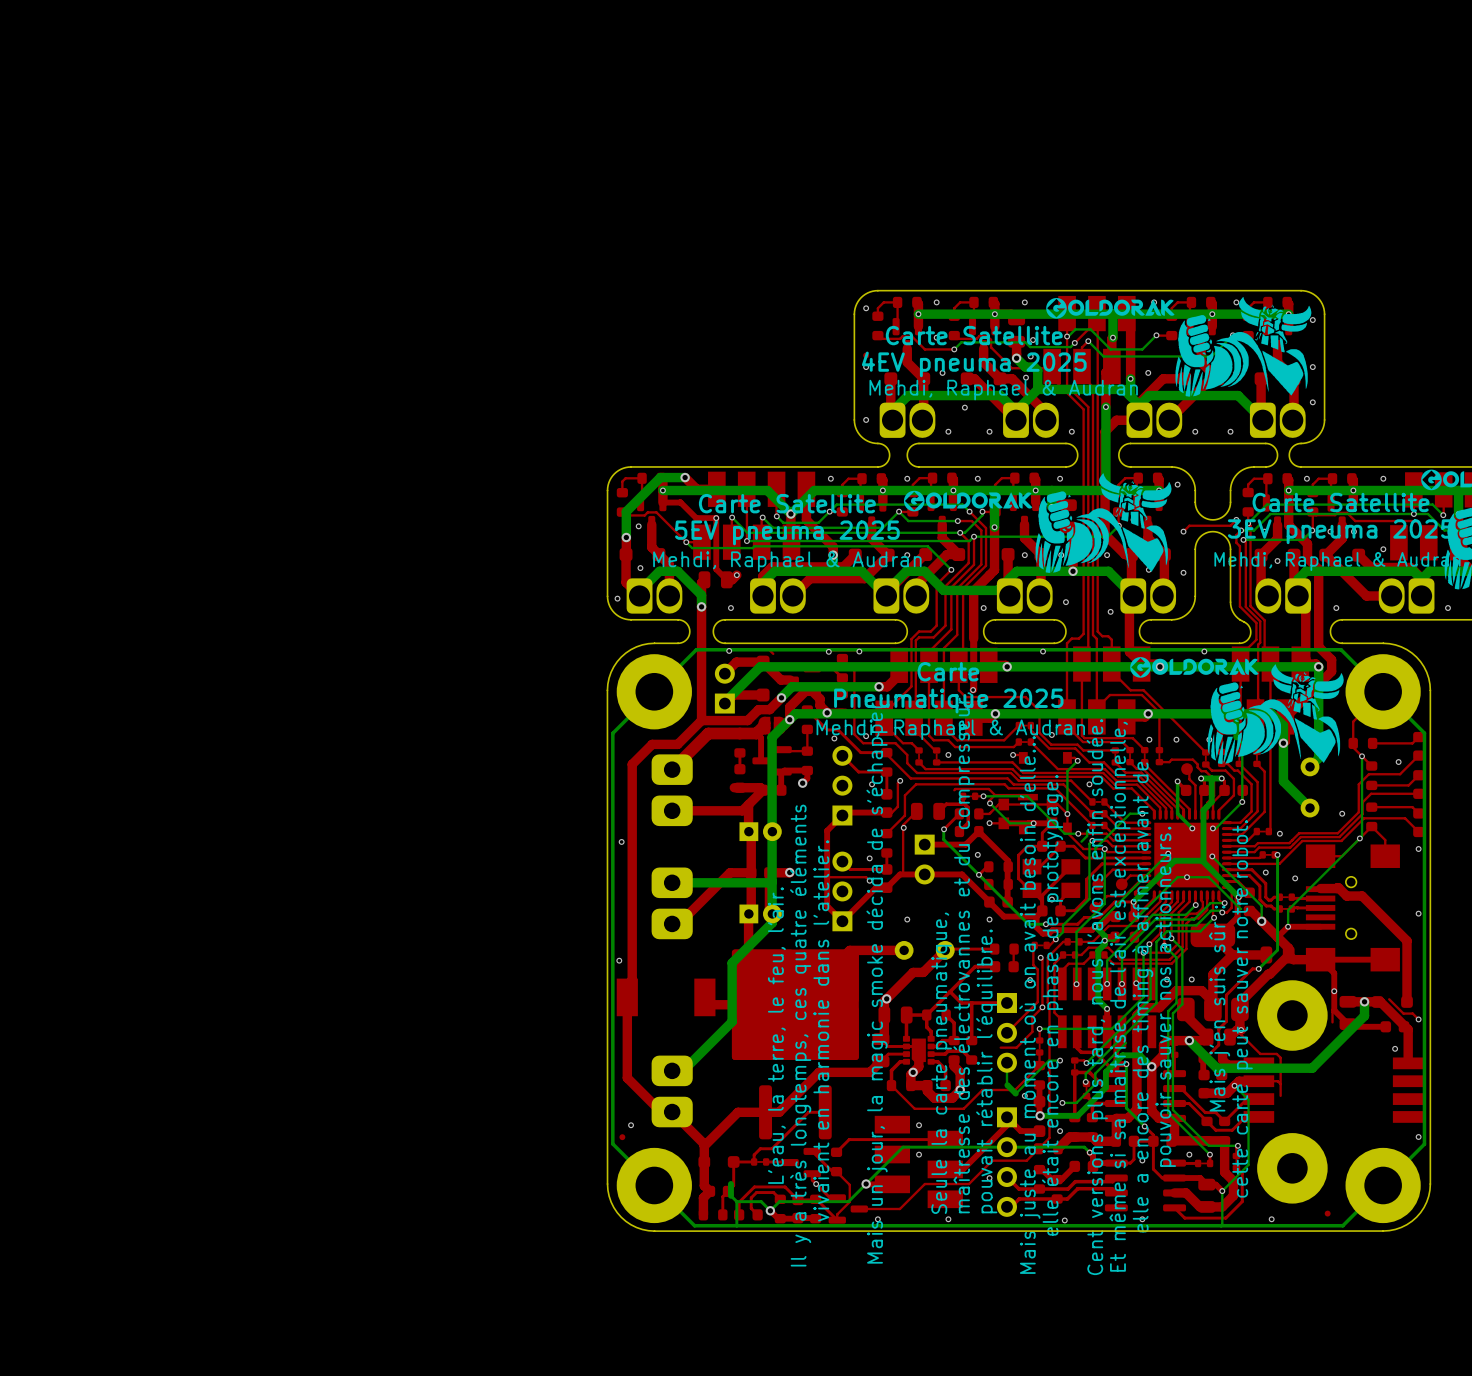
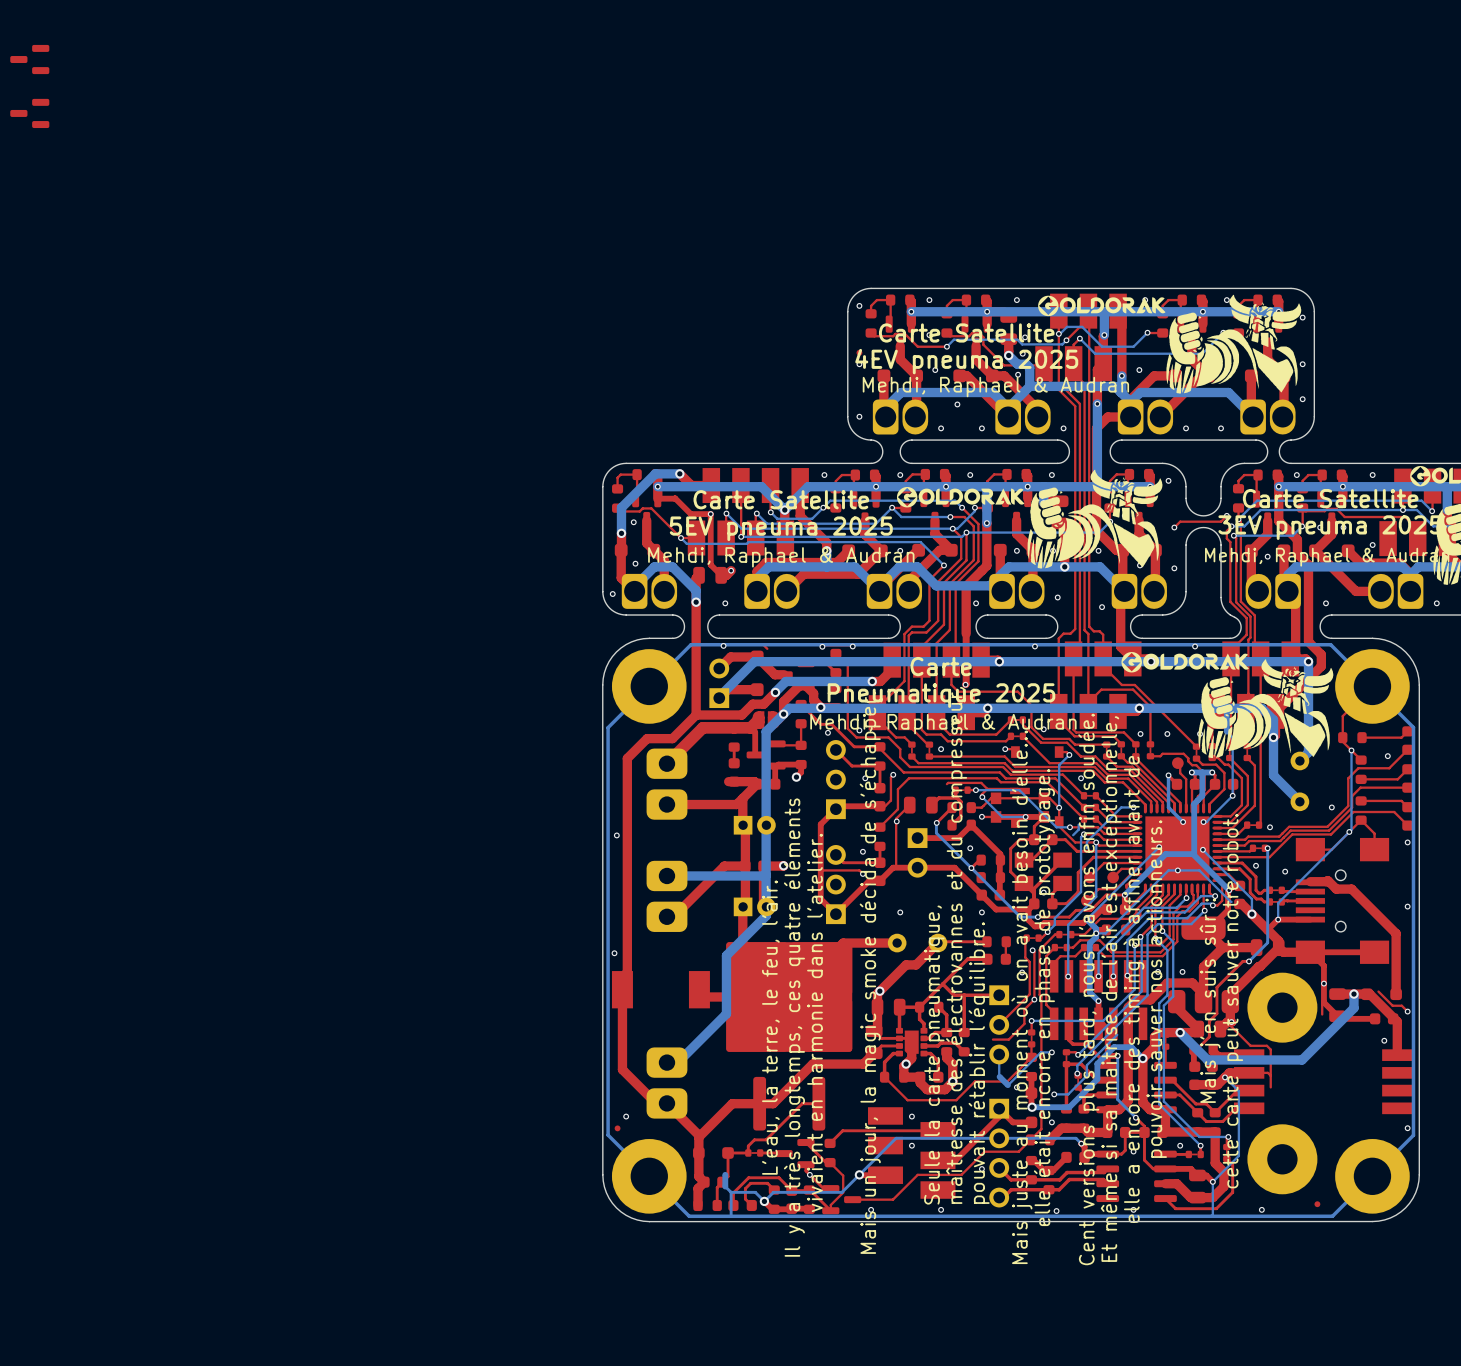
part: none -> (29, 59)
part: none -> (29, 113)

